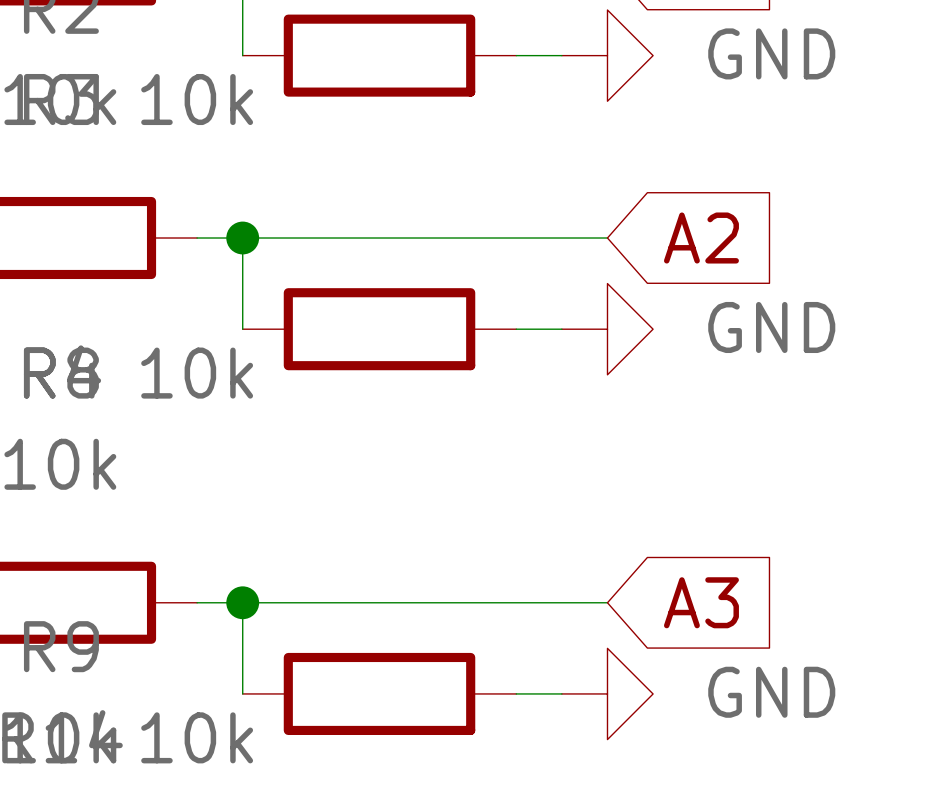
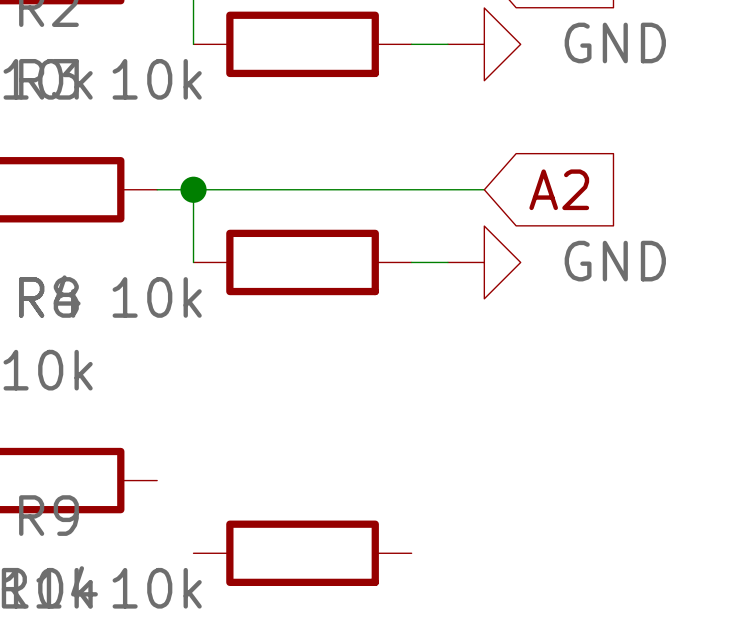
wire: (197, 602) (607, 602) -> none
wire: (242, 602) (242, 693) -> none
junction: (242, 602) -> none
global label: A3 (701, 602) -> none
wire: (516, 693) (561, 693) -> none
power symbol: GND (607, 693) -> none

